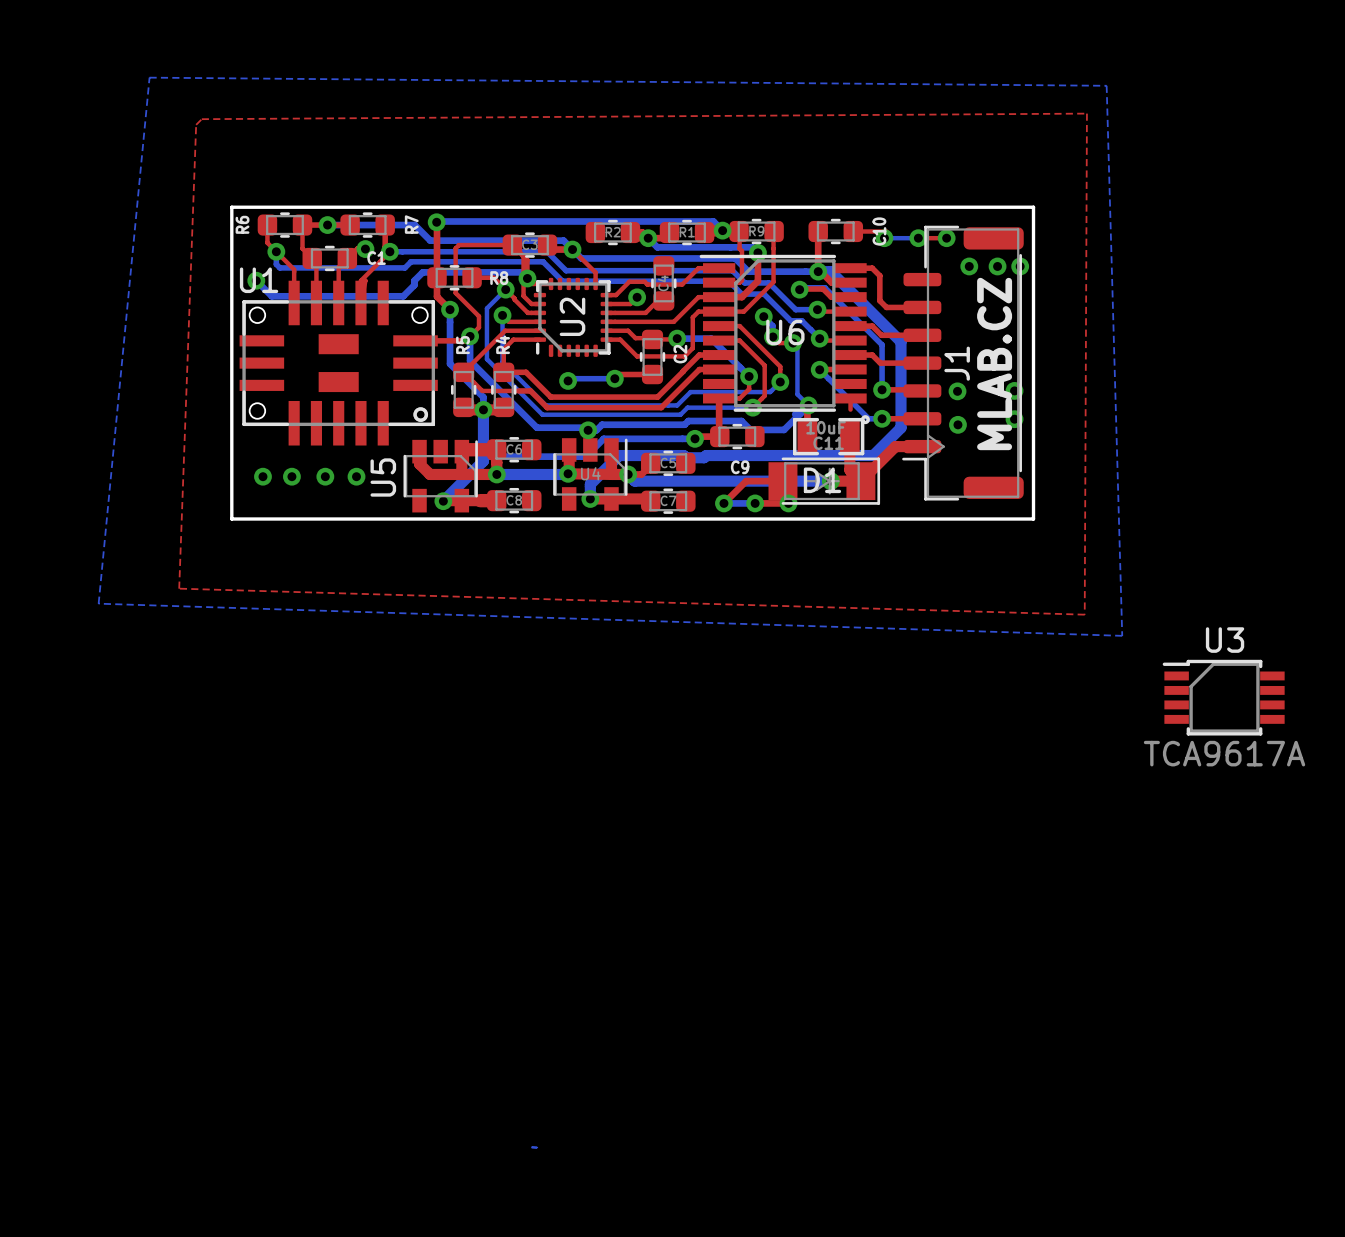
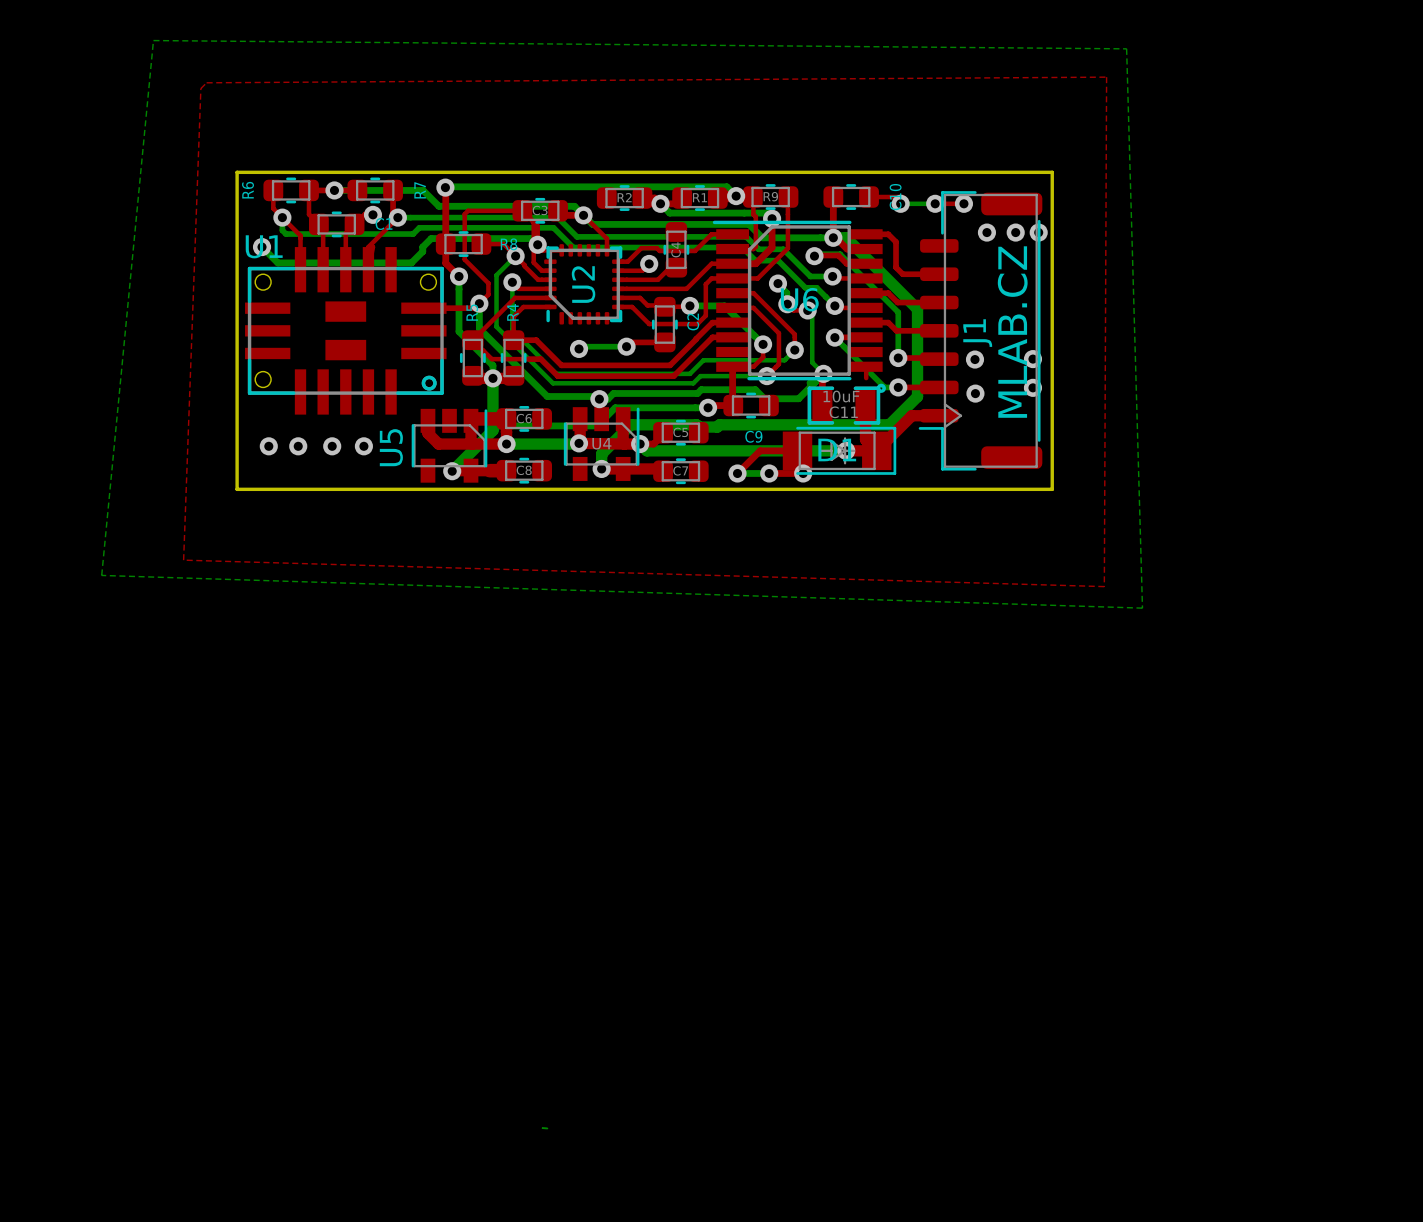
U3: TCA9617A (1223, 697) -> none

